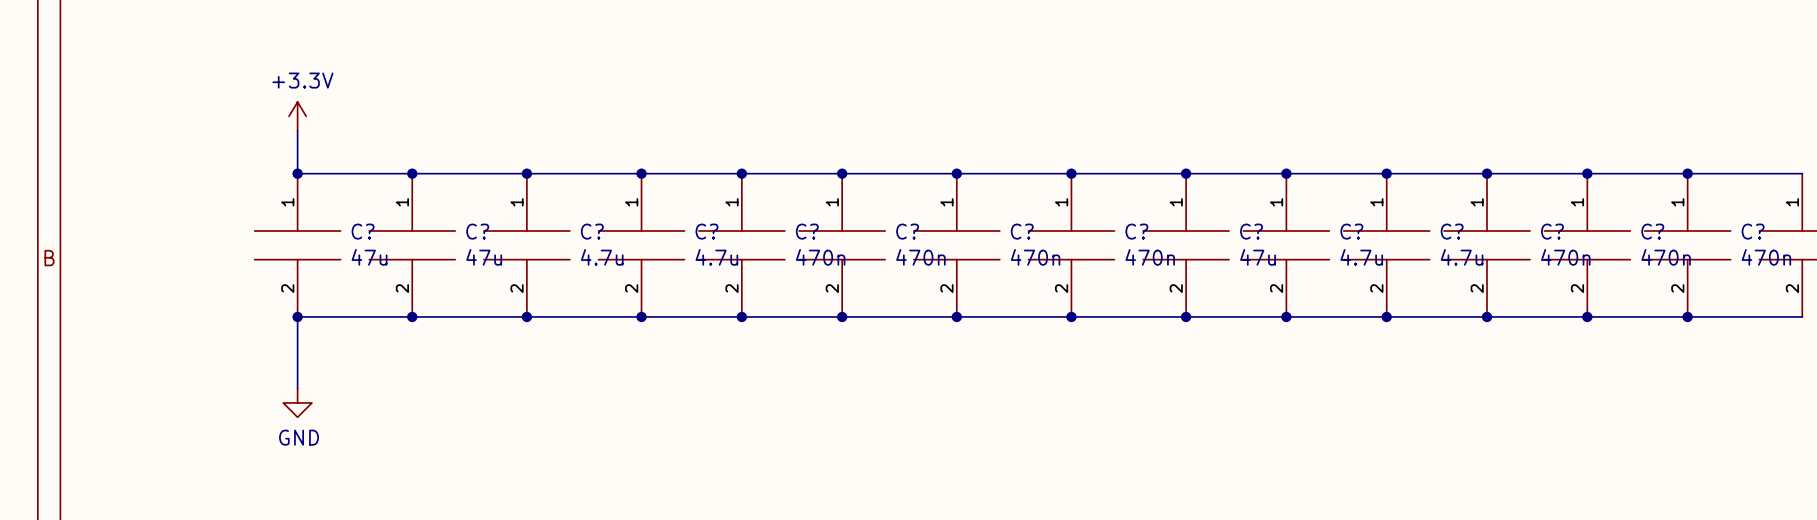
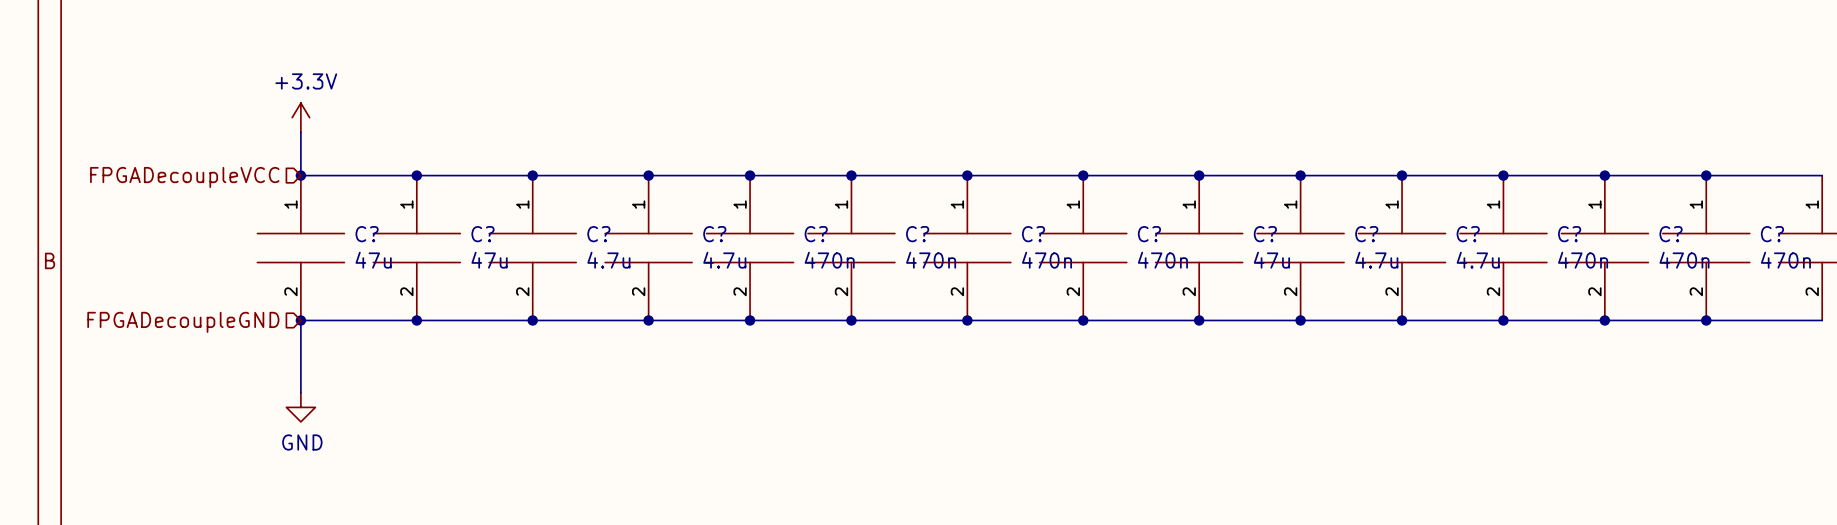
hierarchical label: none -> FPGADecoupleVCC (184, 177)
hierarchical label: none -> FPGADecoupleGND (183, 322)

